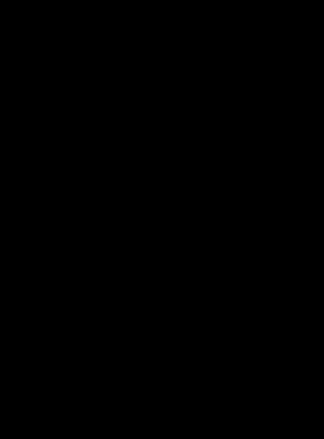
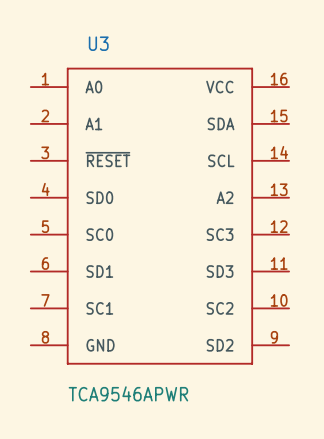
U3: none -> TCA9546APWR (159, 216)

